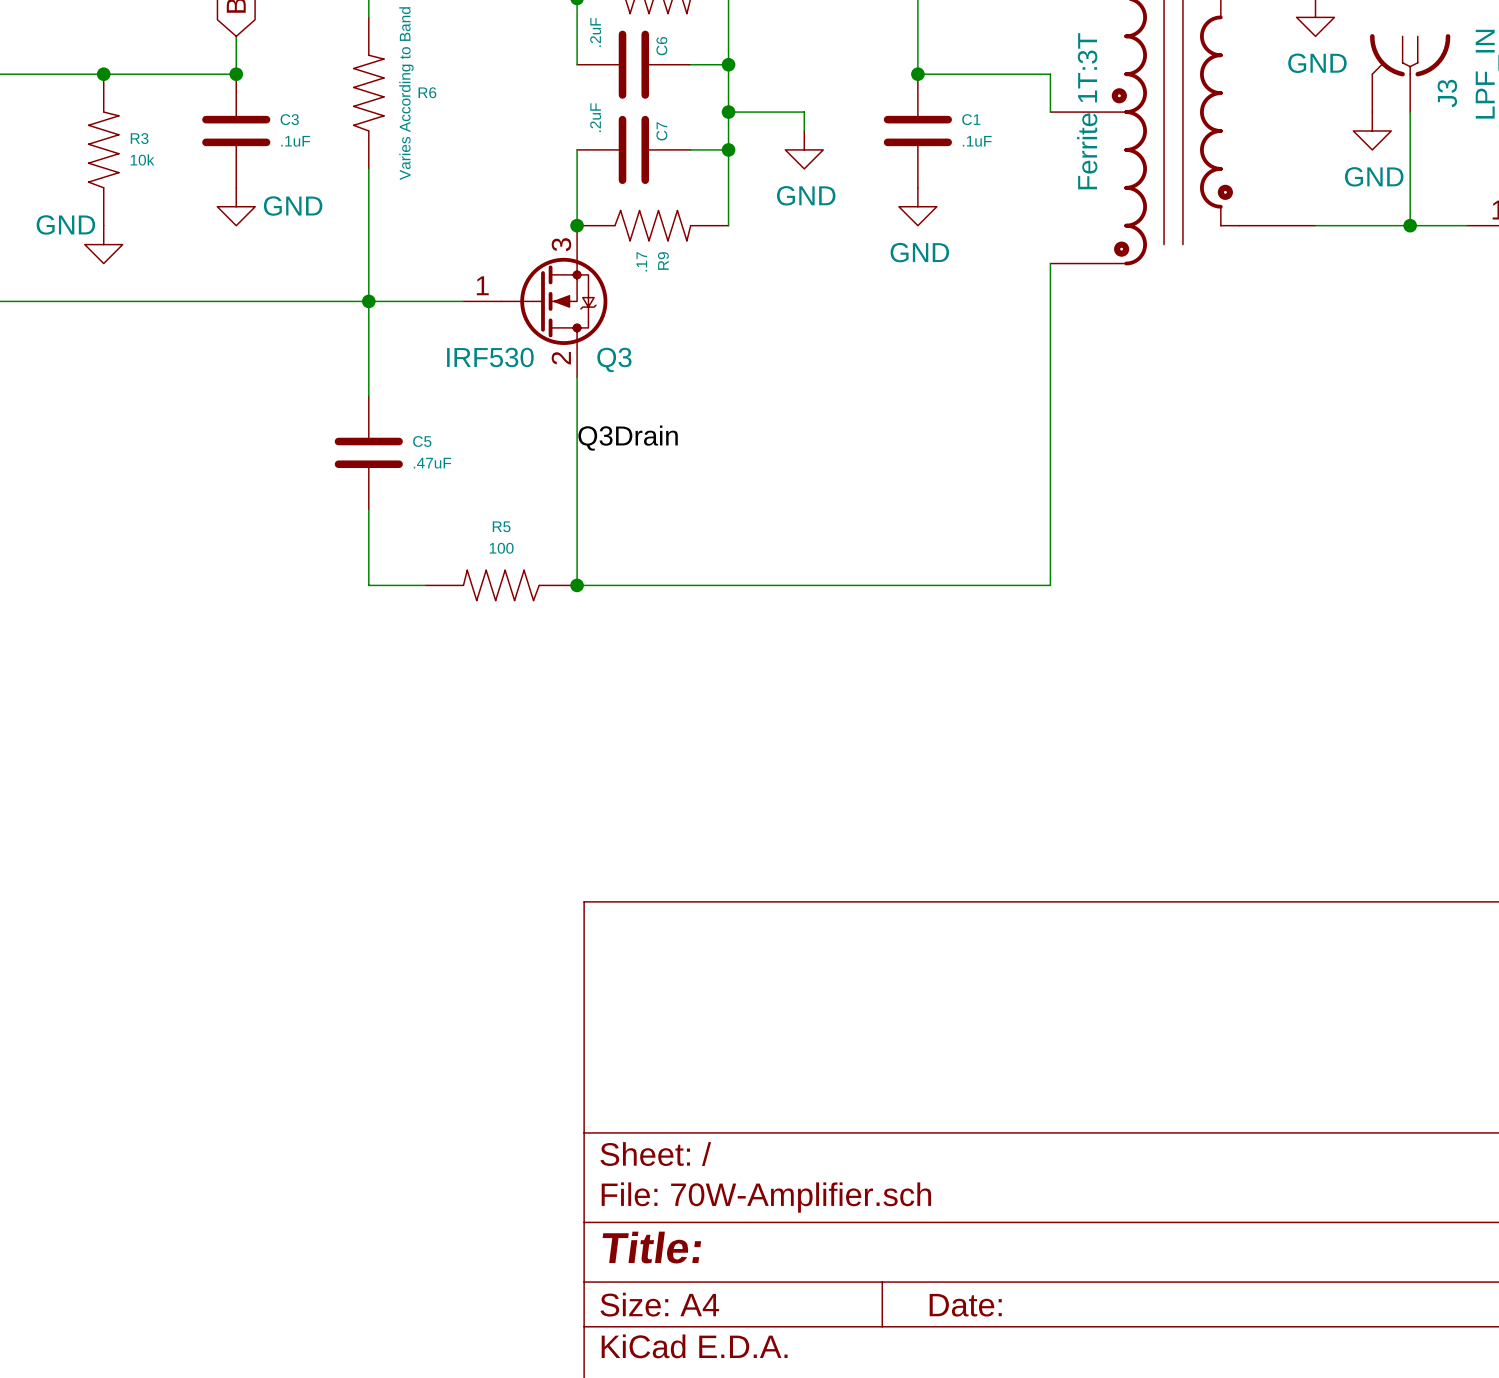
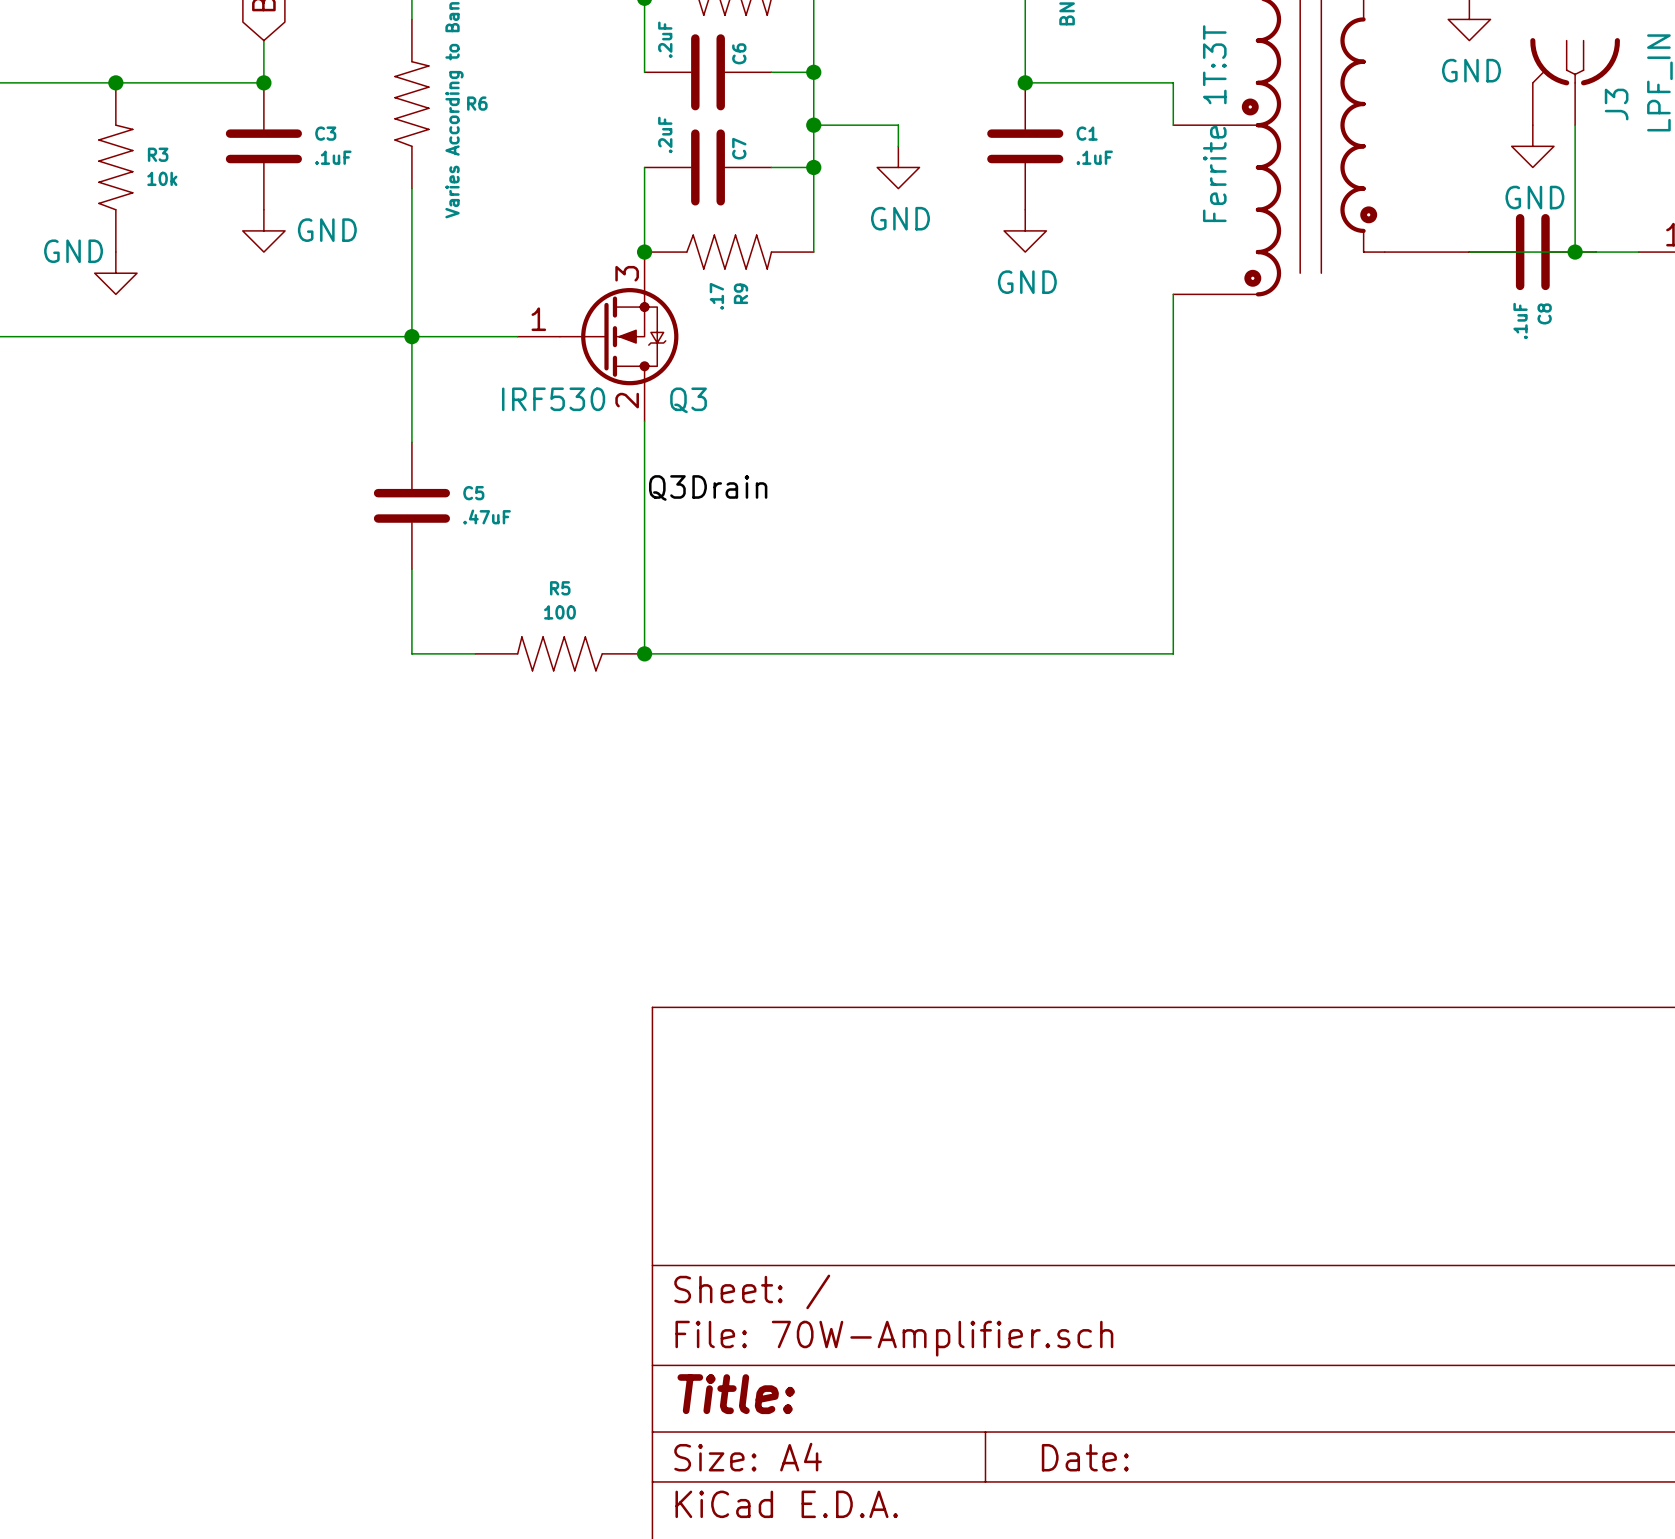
C8: none -> .1uF (1532, 252)

